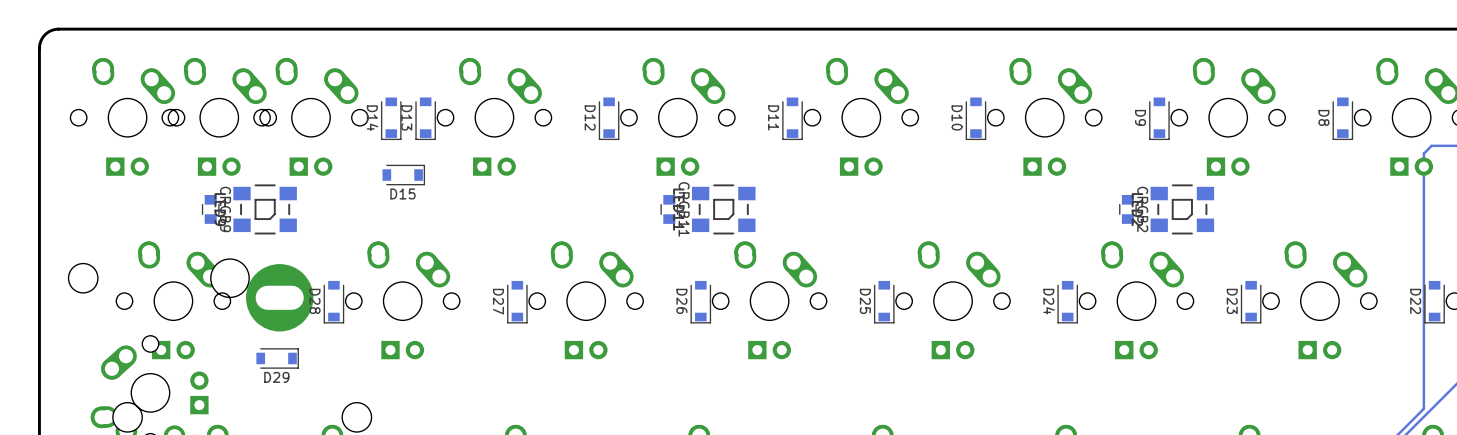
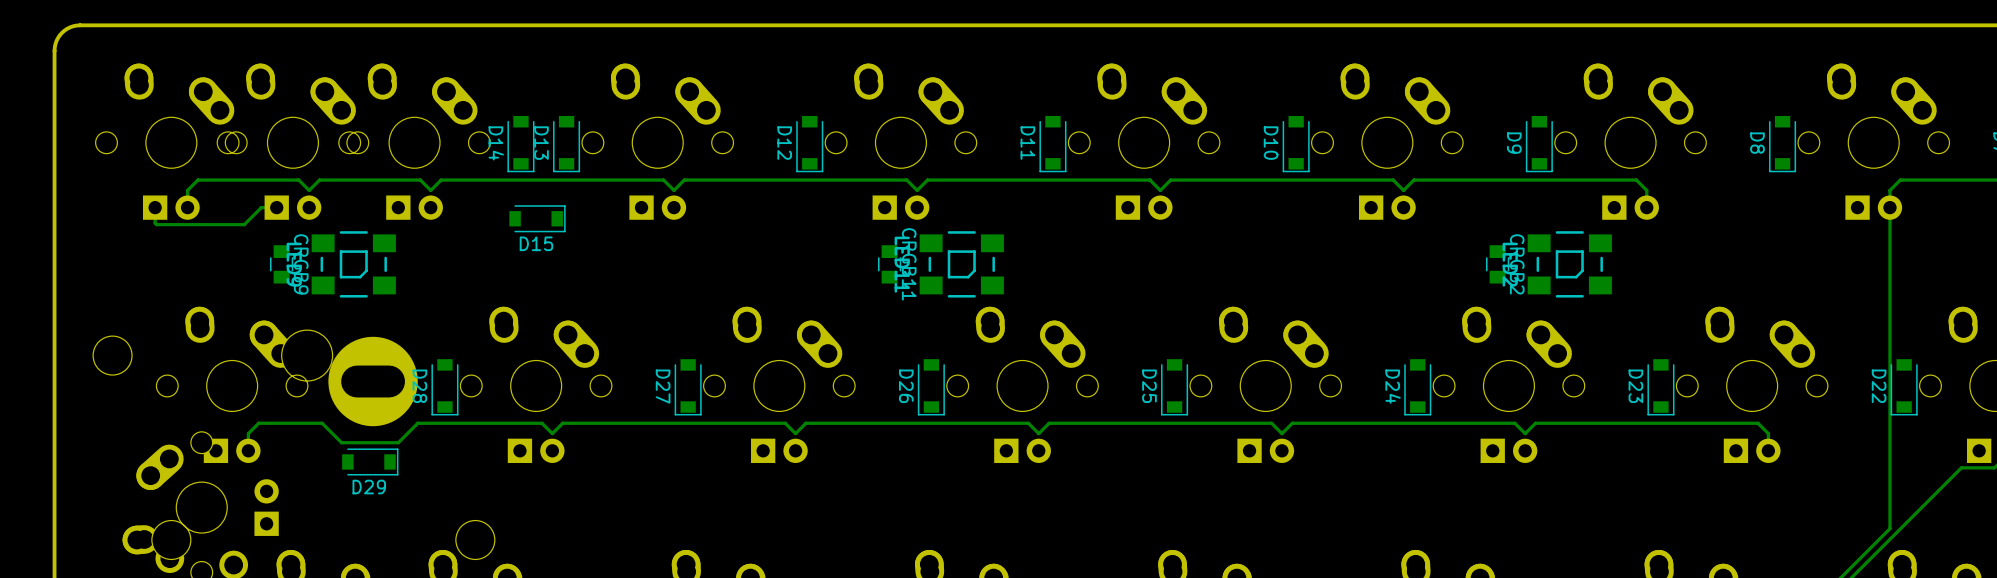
track: none -> (276, 207) (261, 207) (244, 224) (156, 224) (155, 207)
track: none -> (1646, 207) (1646, 190) (1636, 180) (1413, 180) (1403, 190) (1393, 180) (1170, 180) (1160, 190) (1150, 180) (927, 180) (917, 190) (906, 180) (684, 180) (673, 190) (663, 180) (441, 180) (430, 190) (420, 180) (319, 180) (309, 190) (298, 180) (197, 180) (187, 190) (187, 207)
track: none -> (1768, 450) (1768, 433) (1758, 423) (1535, 423) (1525, 433) (1514, 423) (1292, 423) (1281, 433) (1271, 423) (1049, 423) (1038, 433) (1028, 423) (805, 423) (795, 433) (785, 423) (562, 423) (552, 433) (542, 423) (417, 423) (398, 442) (341, 442) (322, 423) (258, 423) (248, 433) (248, 450)

